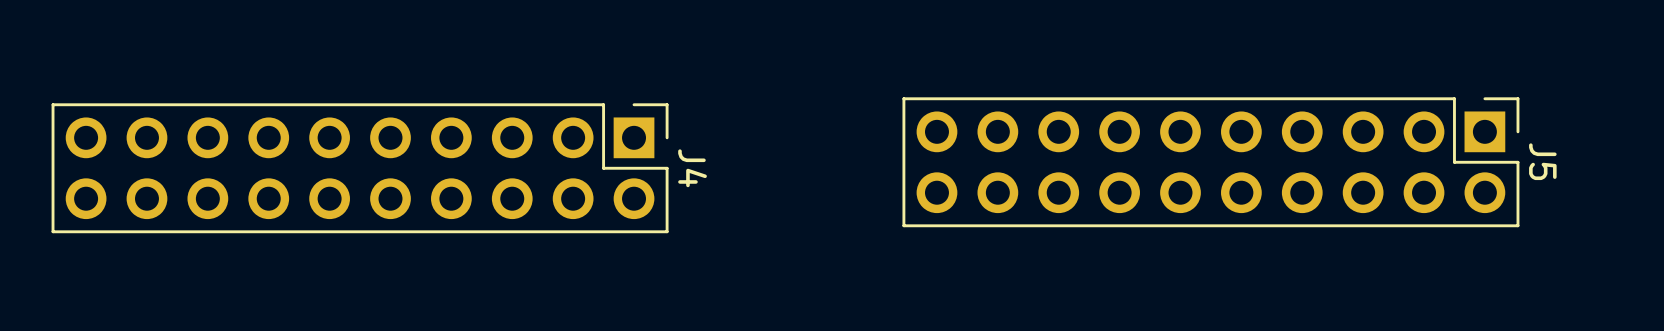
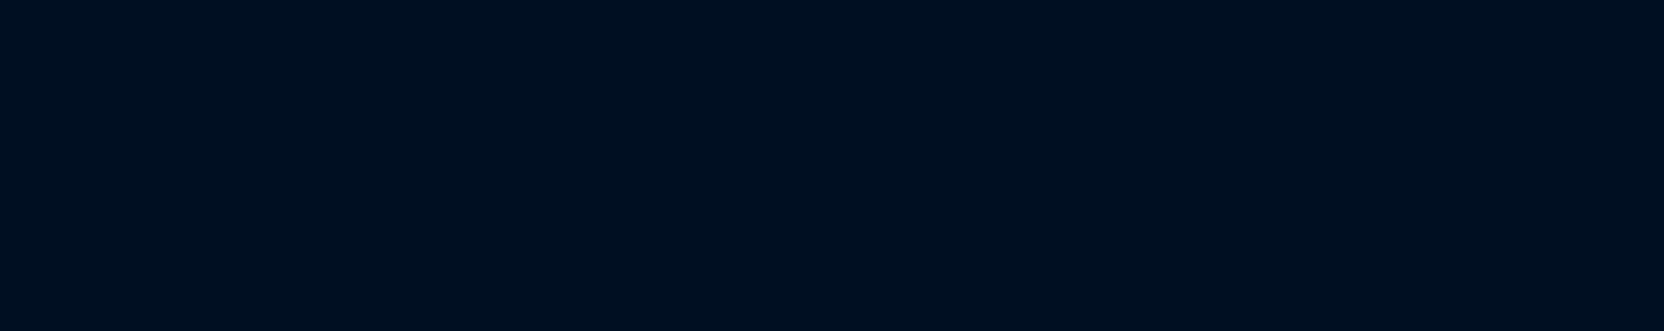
J5: (1210, 162) -> none
J4: (360, 168) -> none

